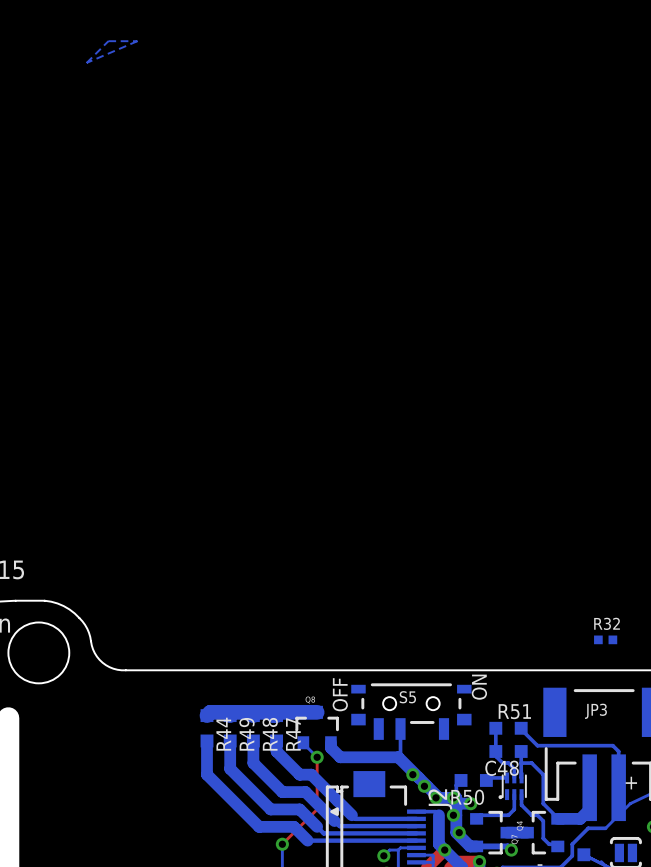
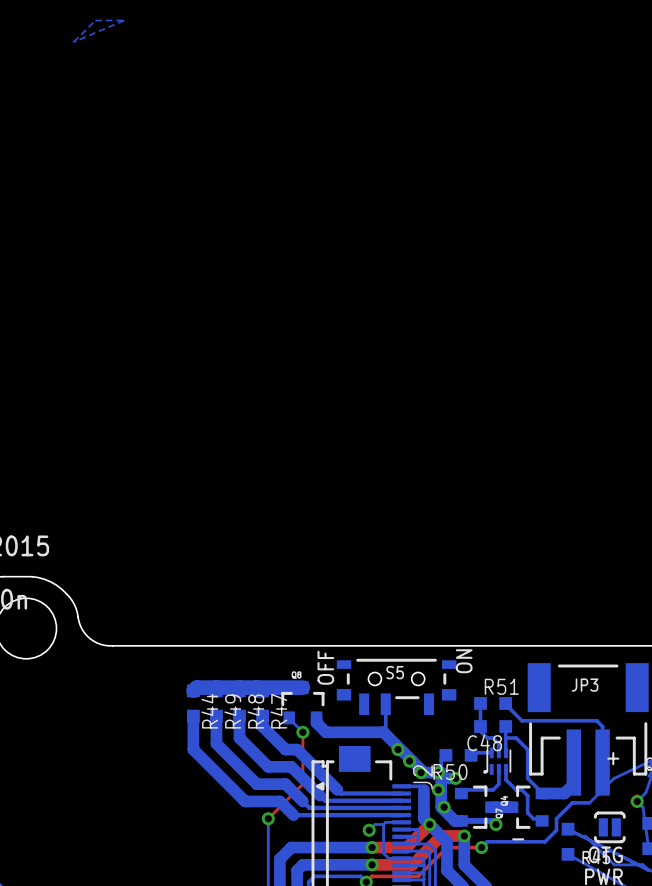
R32: (605, 639) -> none

